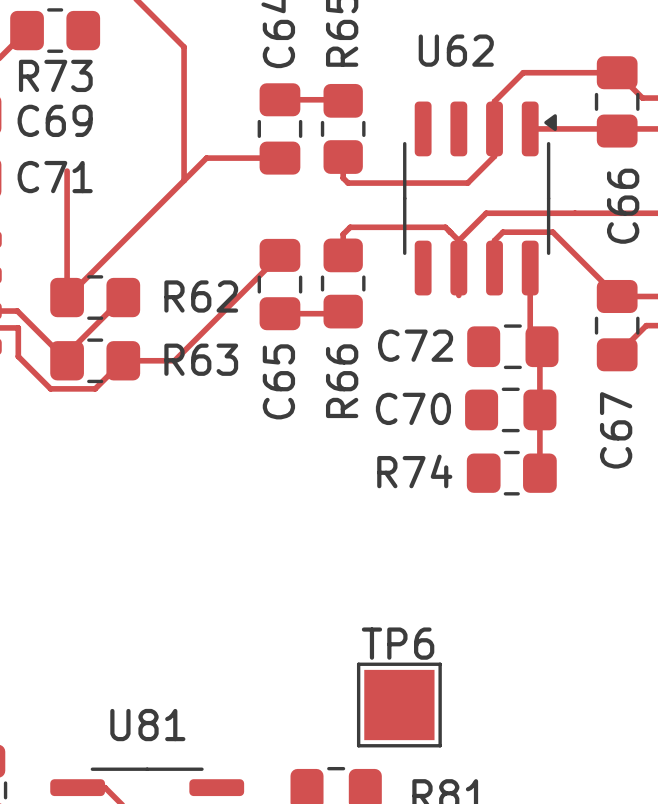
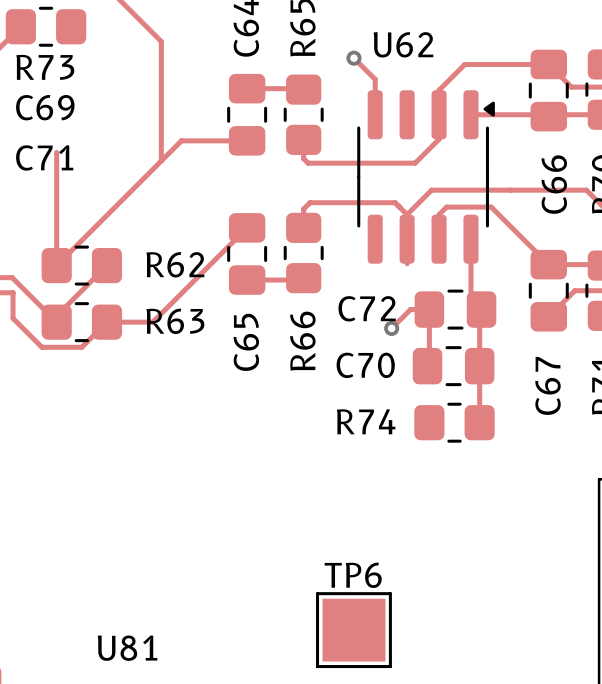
top track: none -> (353, 58) (375, 79) (375, 114)
via: none -> (353, 58)
top track: none -> (391, 328) (410, 309) (429, 309) (429, 364) (427, 366)
via: none -> (391, 328)

